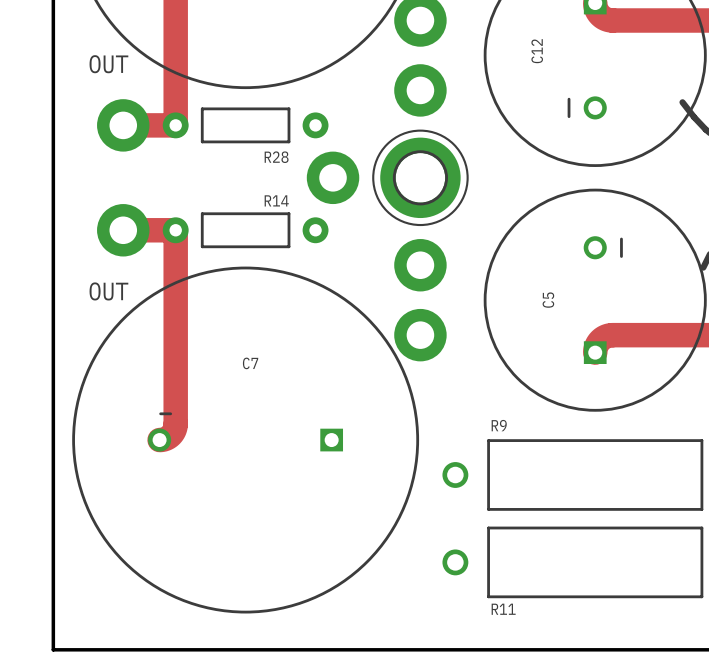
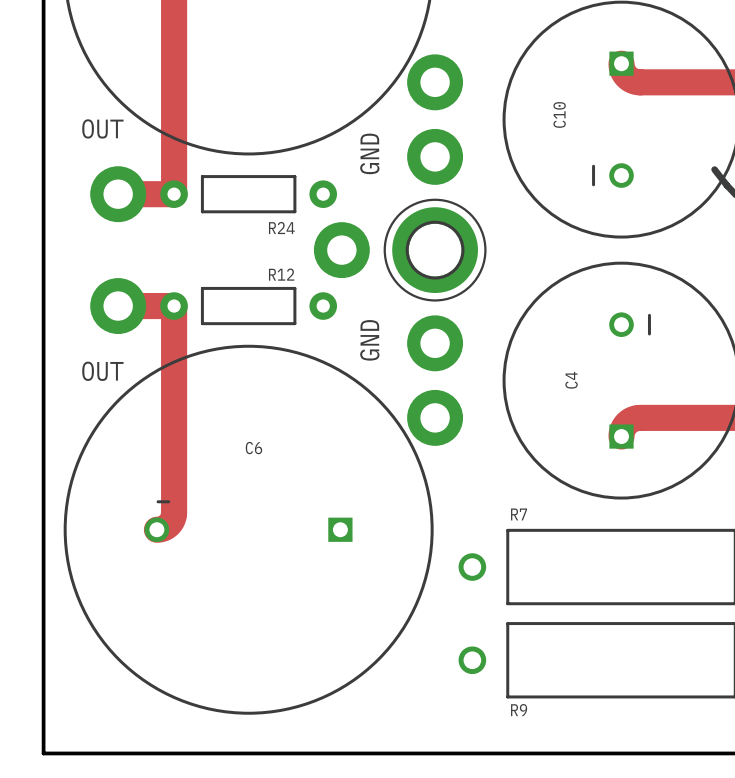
C12 name: C12 (537, 51) -> C10 (559, 114)
text: none -> GND (369, 153)
R28 name: R28 (276, 157) -> R24 (281, 228)
R14 name: R14 (276, 200) -> R12 (281, 274)
text: none -> GND (369, 340)
C5 name: C5 (548, 300) -> C4 (571, 380)
C7 name: C7 (250, 363) -> C6 (253, 448)
R9 name: R9 (499, 425) -> R7 (519, 514)
R11 name: R11 (503, 609) -> R9 (519, 710)

